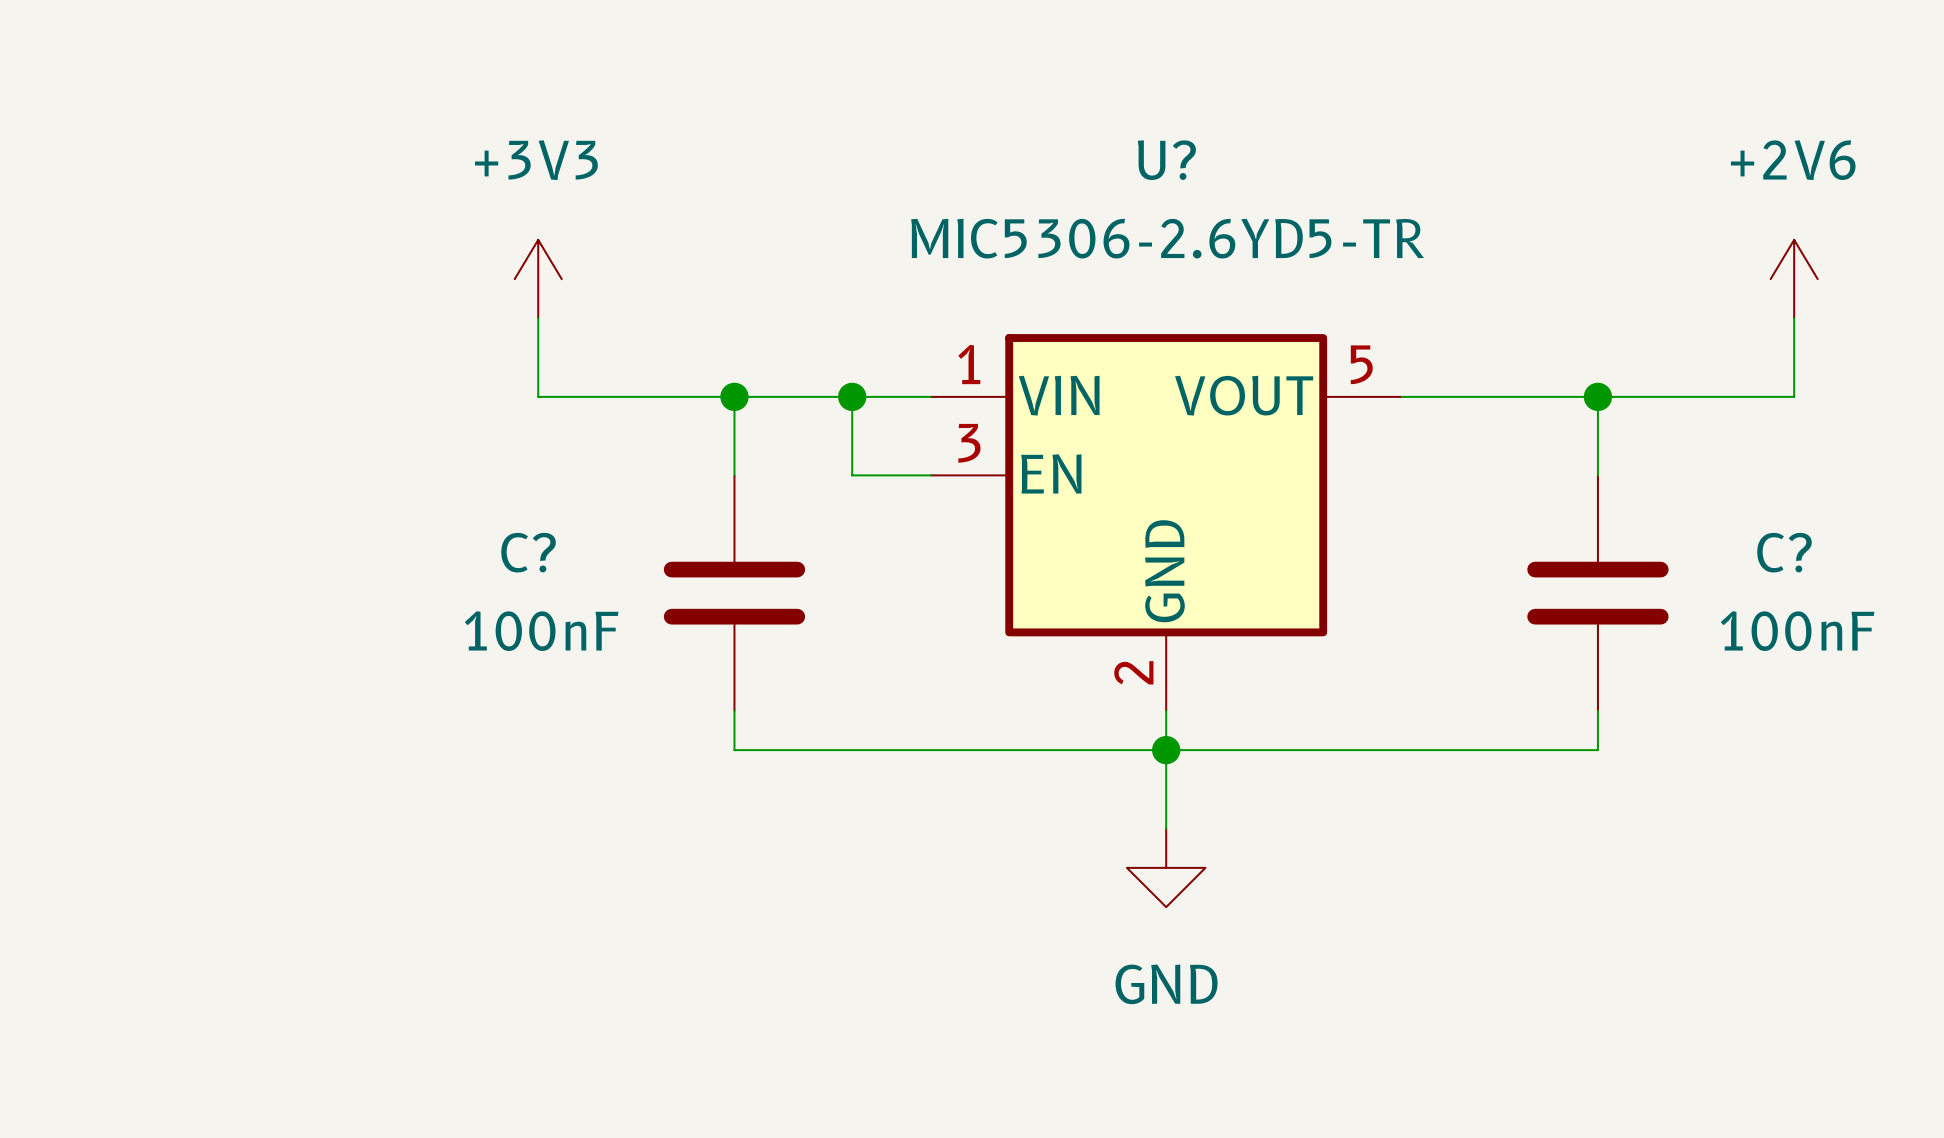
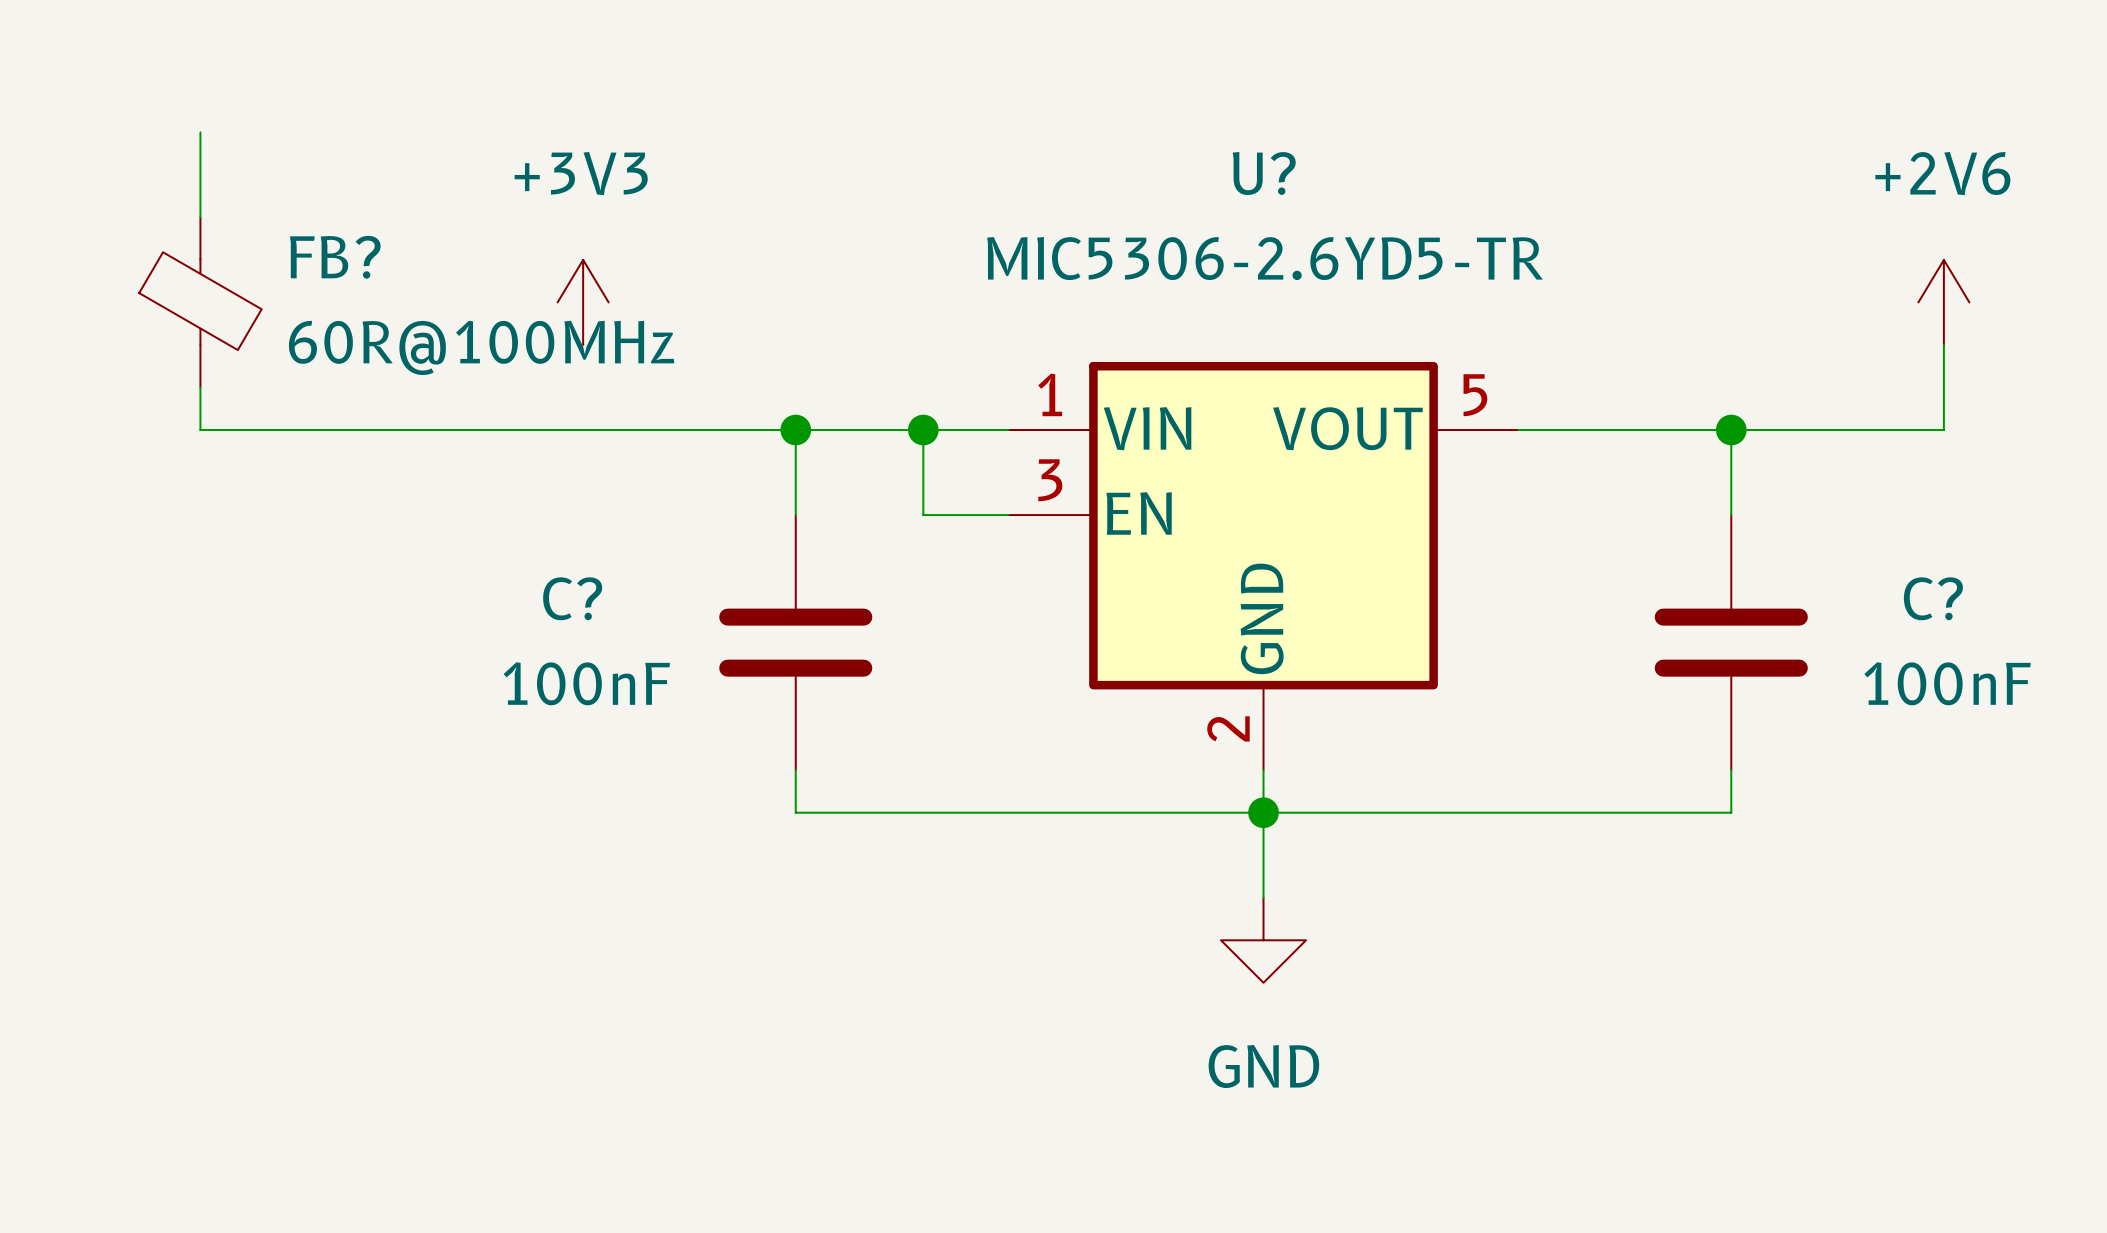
wire: none -> (200, 132) (200, 217)
FB?: none -> 60R@100MHz (200, 302)
wire: (538, 318) (538, 396) -> (200, 387) (200, 430) (583, 430)

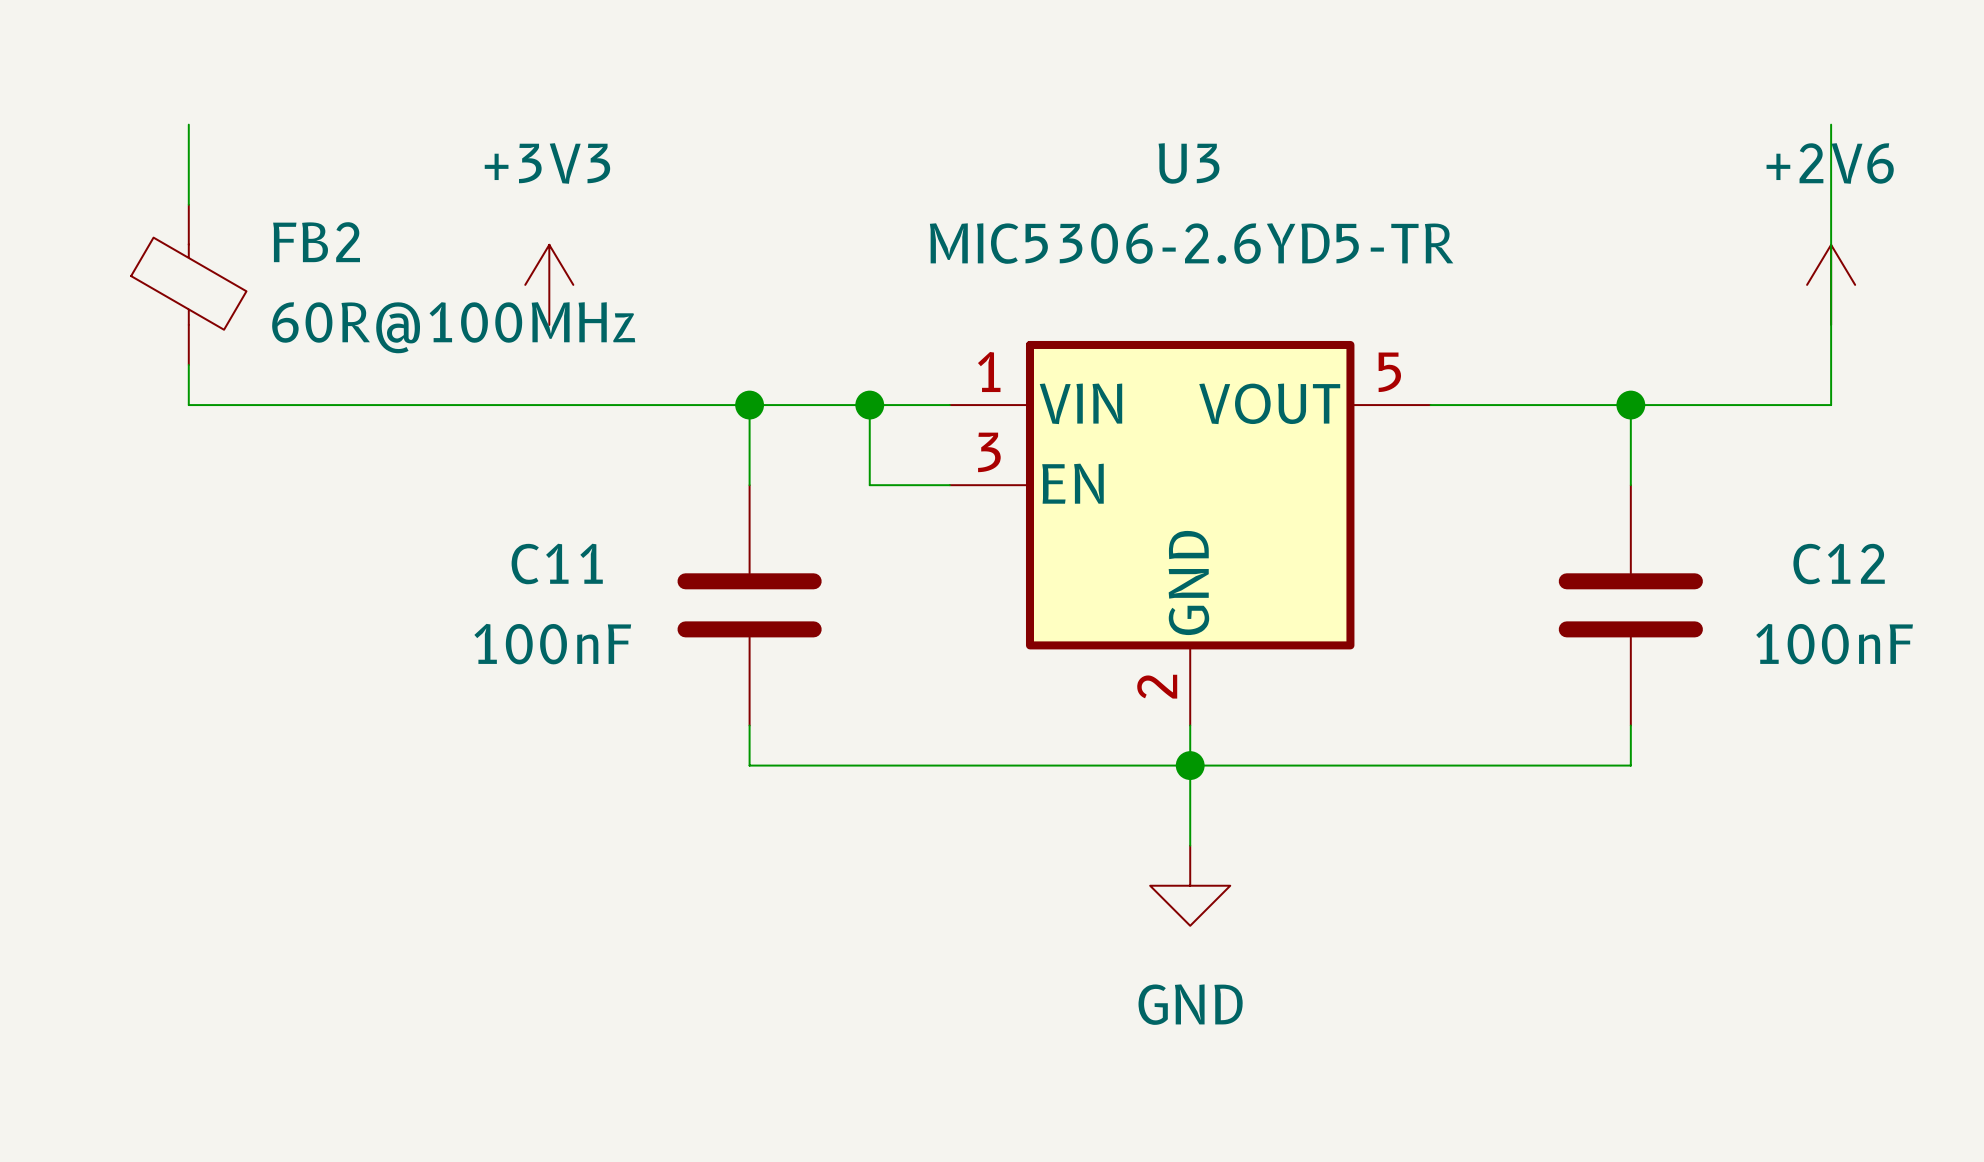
wire: none -> (1831, 124) (1831, 324)
U? name: U? (1264, 173) -> U3 (1189, 163)
FB? name: FB? (335, 257) -> FB2 (316, 242)
C? name: C? (572, 598) -> C11 (557, 564)
C? name: C? (1933, 598) -> C12 (1839, 564)

